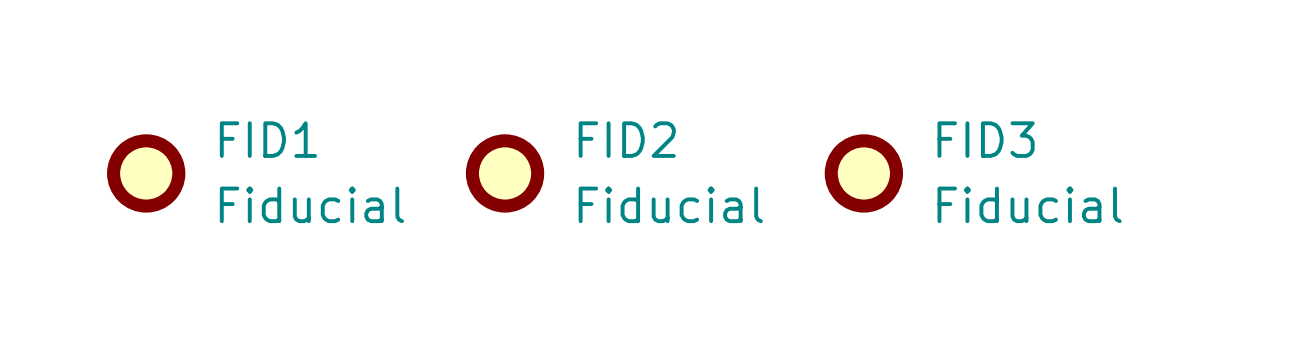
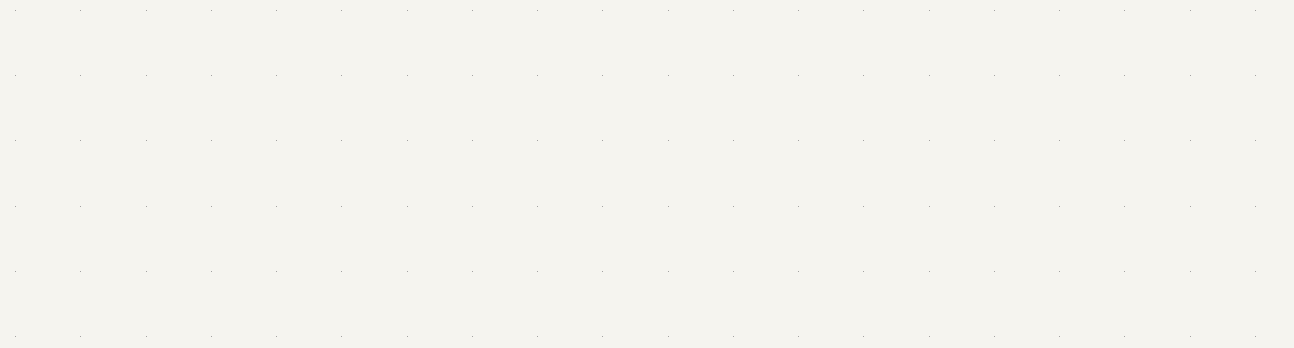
FID1: Fiducial (146, 173) -> none
FID2: Fiducial (505, 173) -> none
FID3: Fiducial (863, 173) -> none

